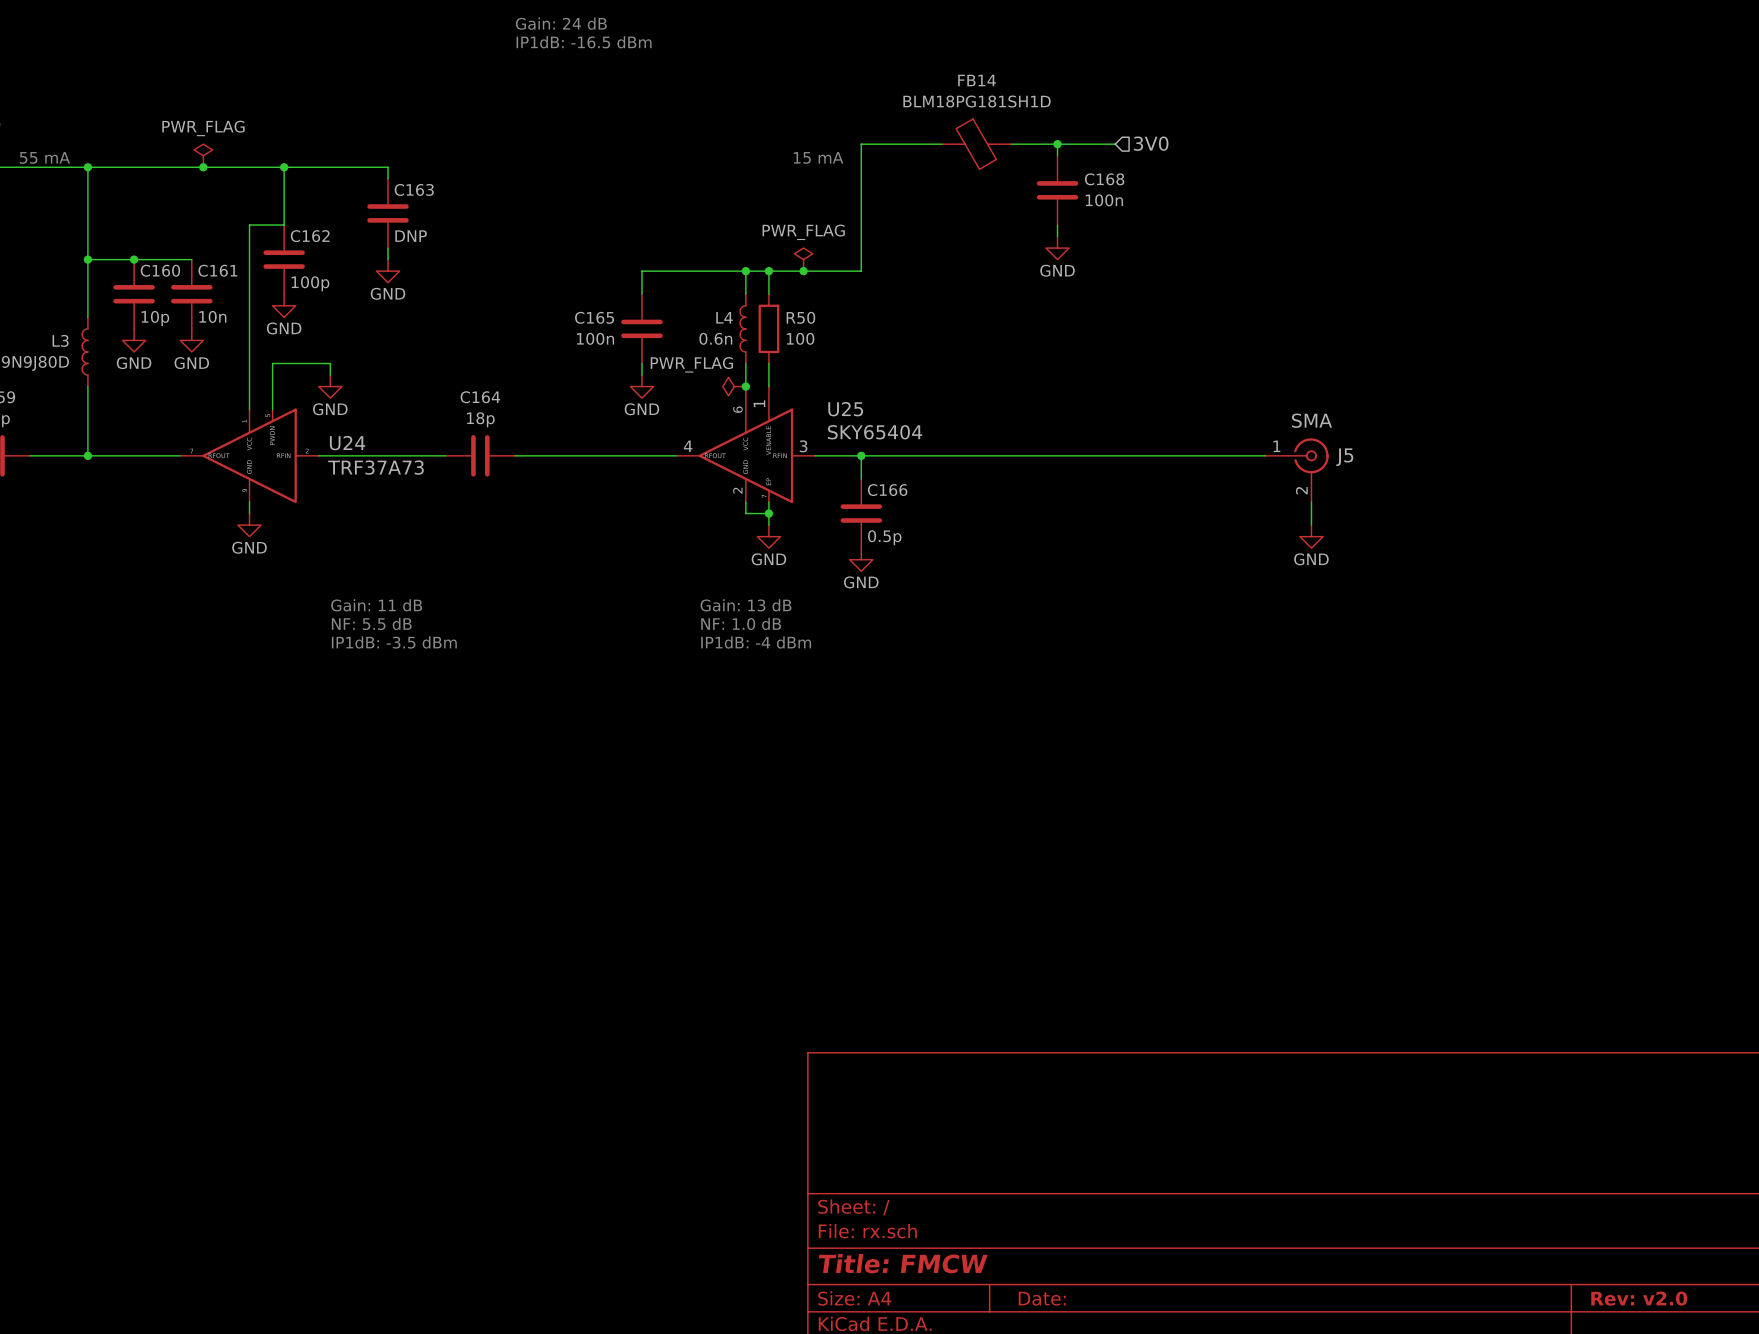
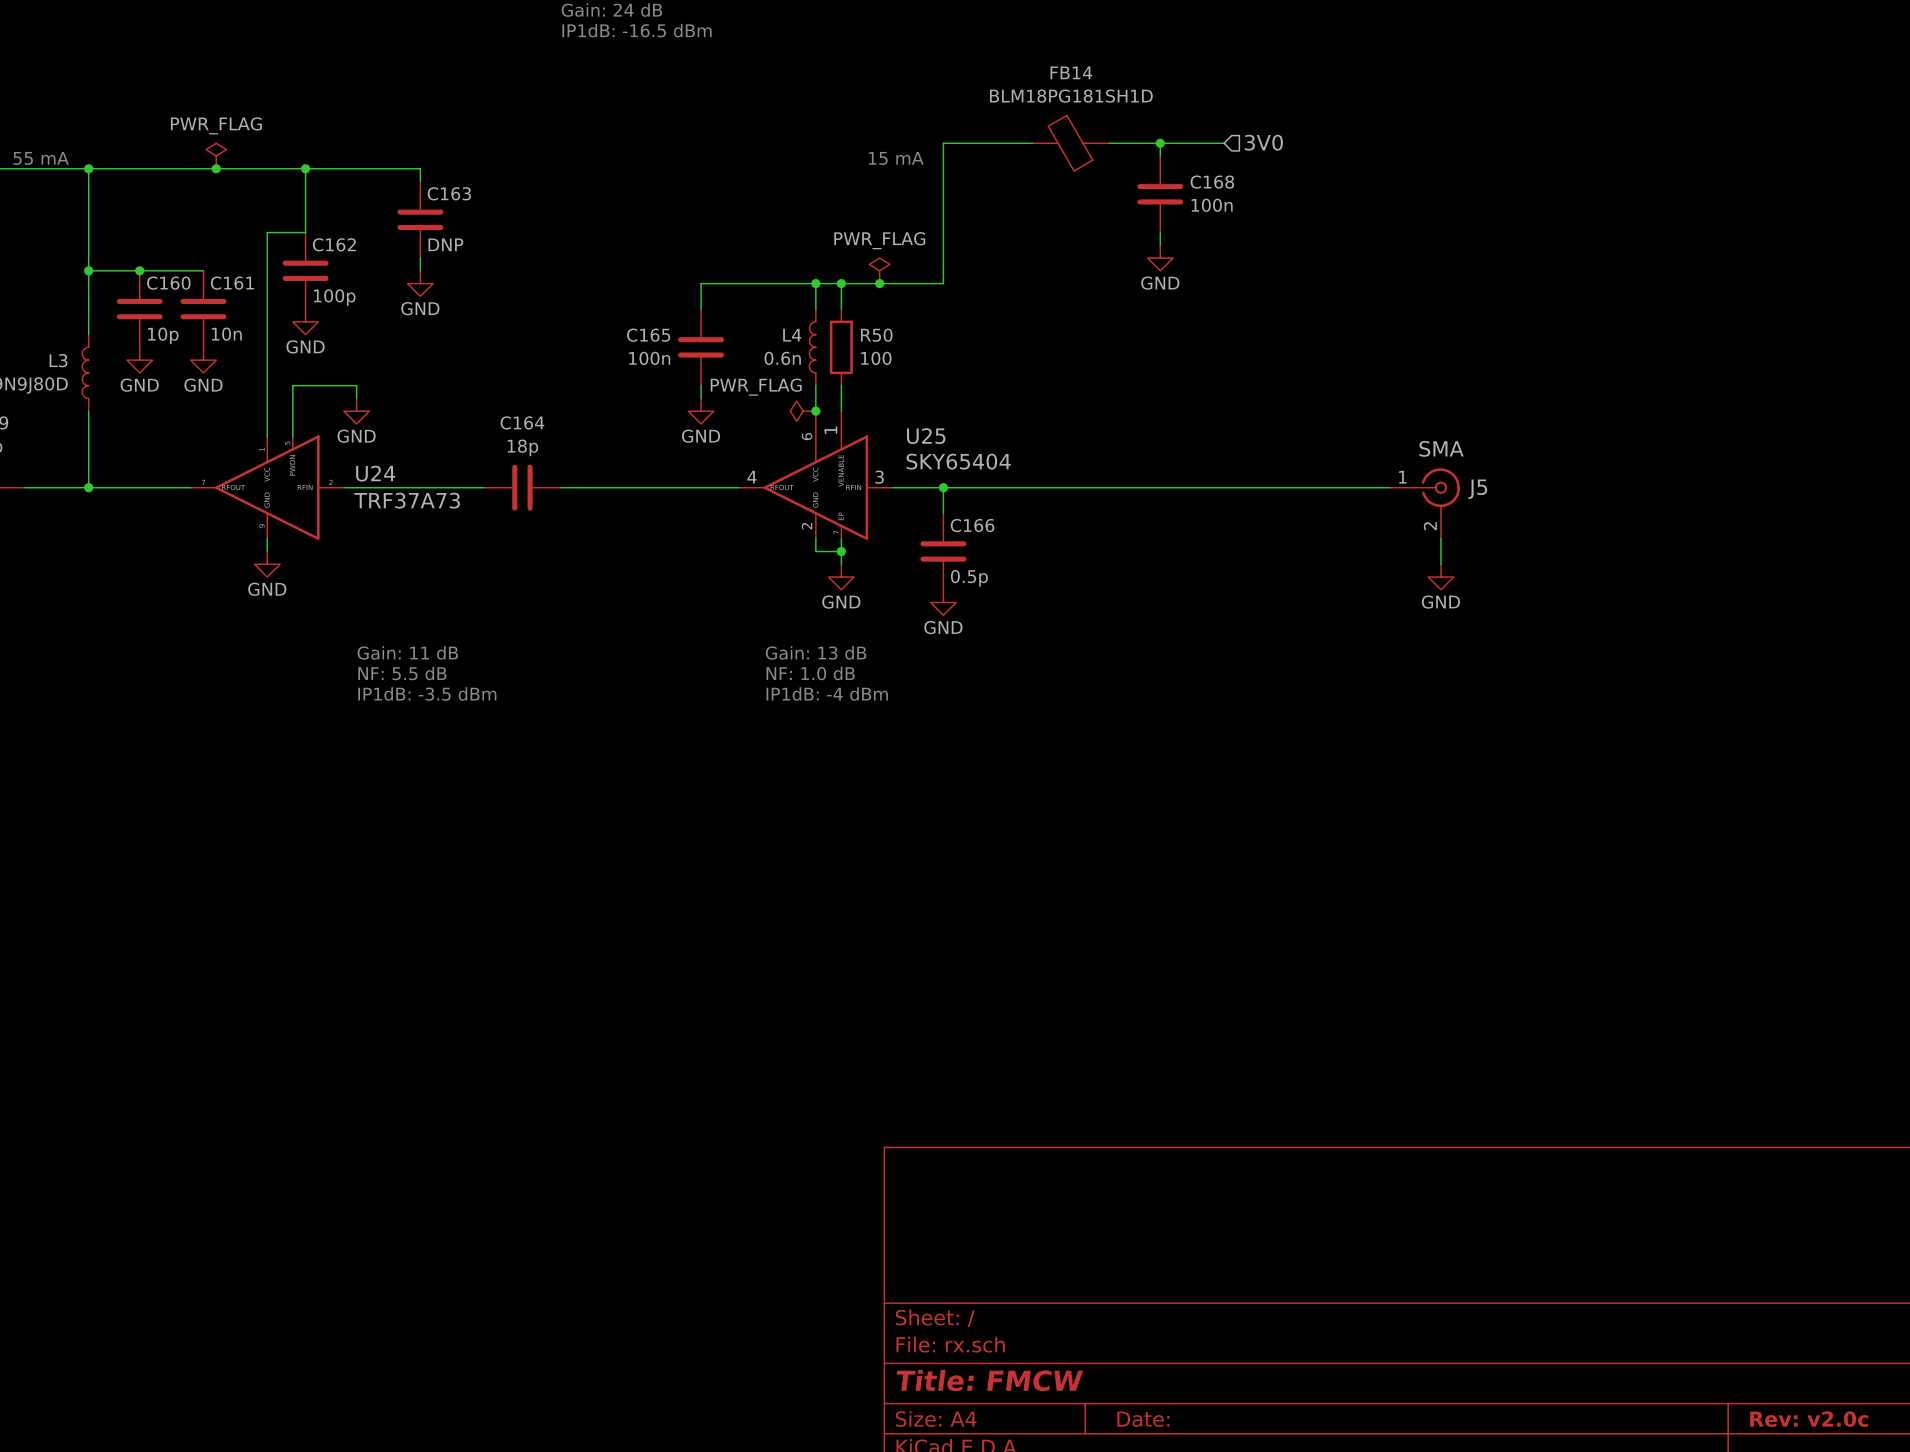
title block: Rev: v2.0 (1639, 1298) -> Rev: v2.0c (1809, 1419)

